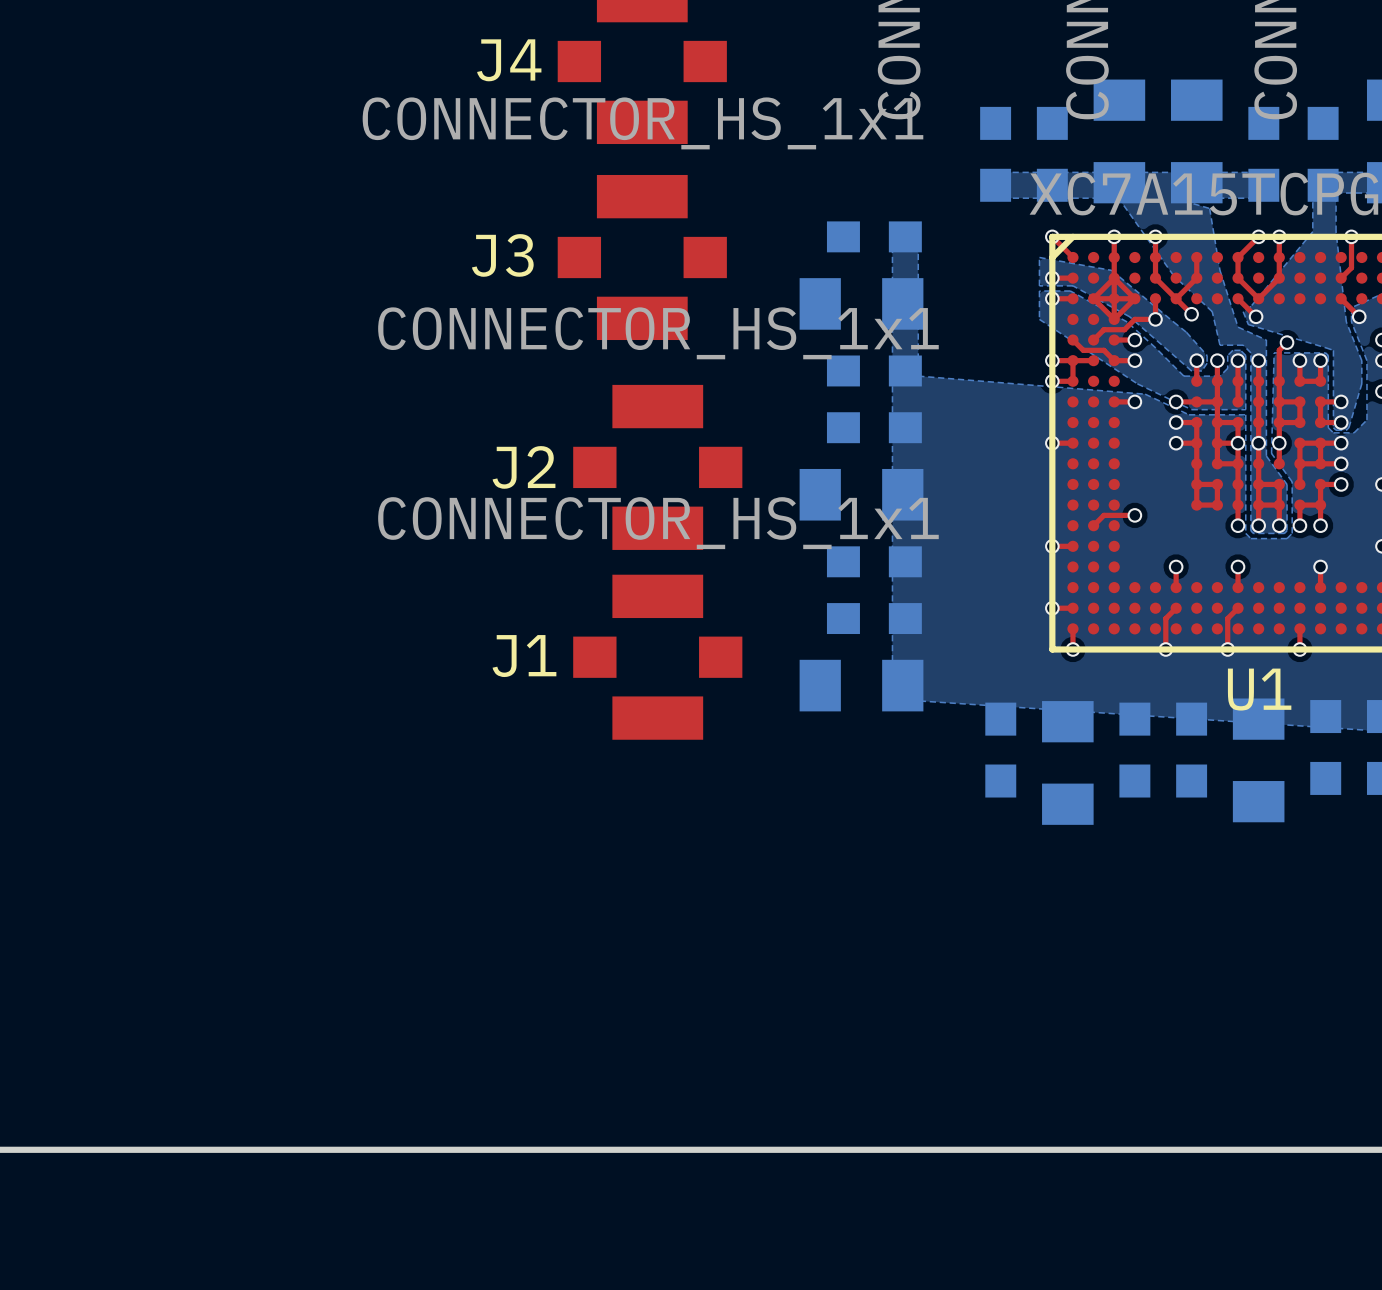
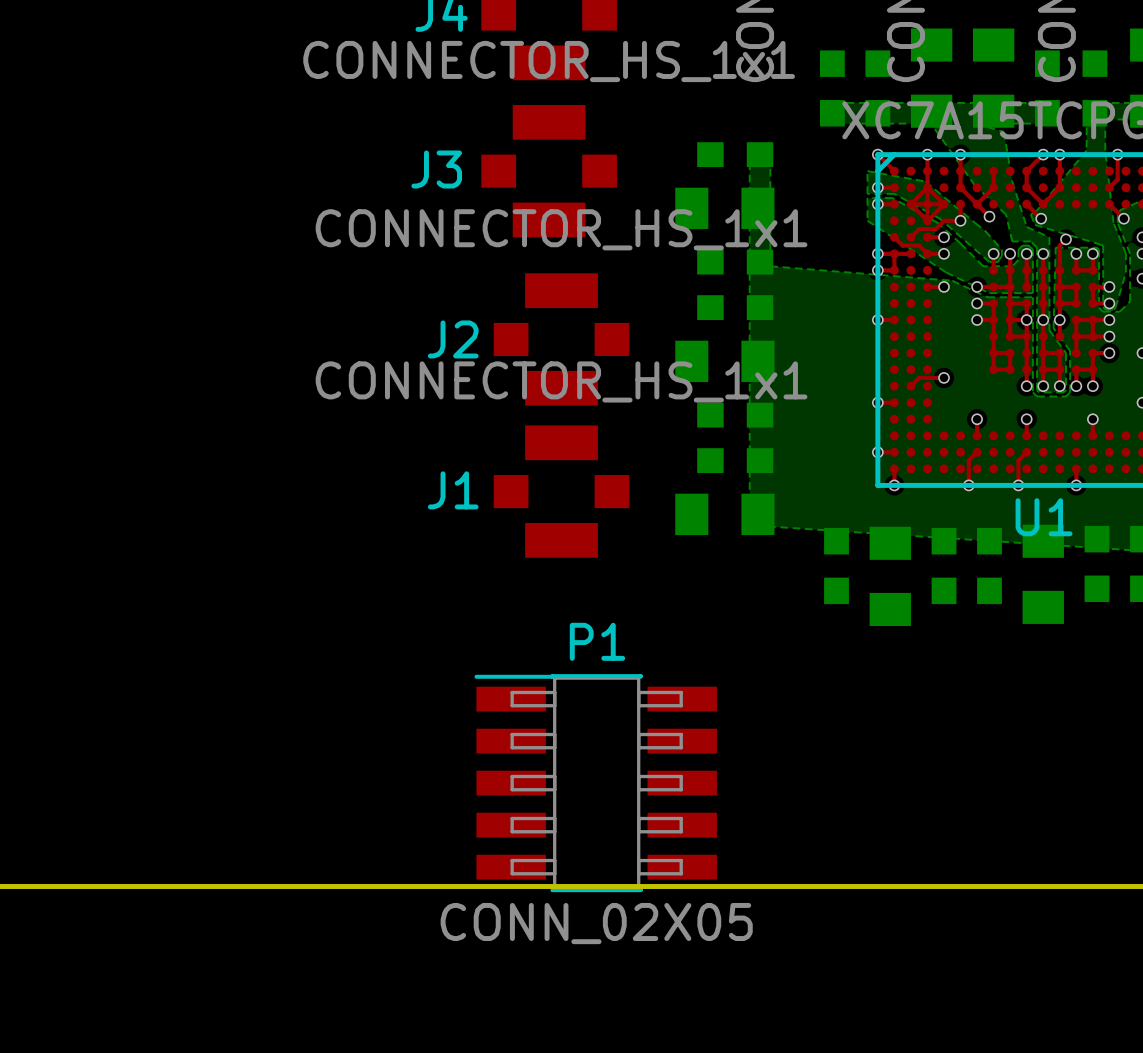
P1: none -> CONN_02X05 (595, 783)

